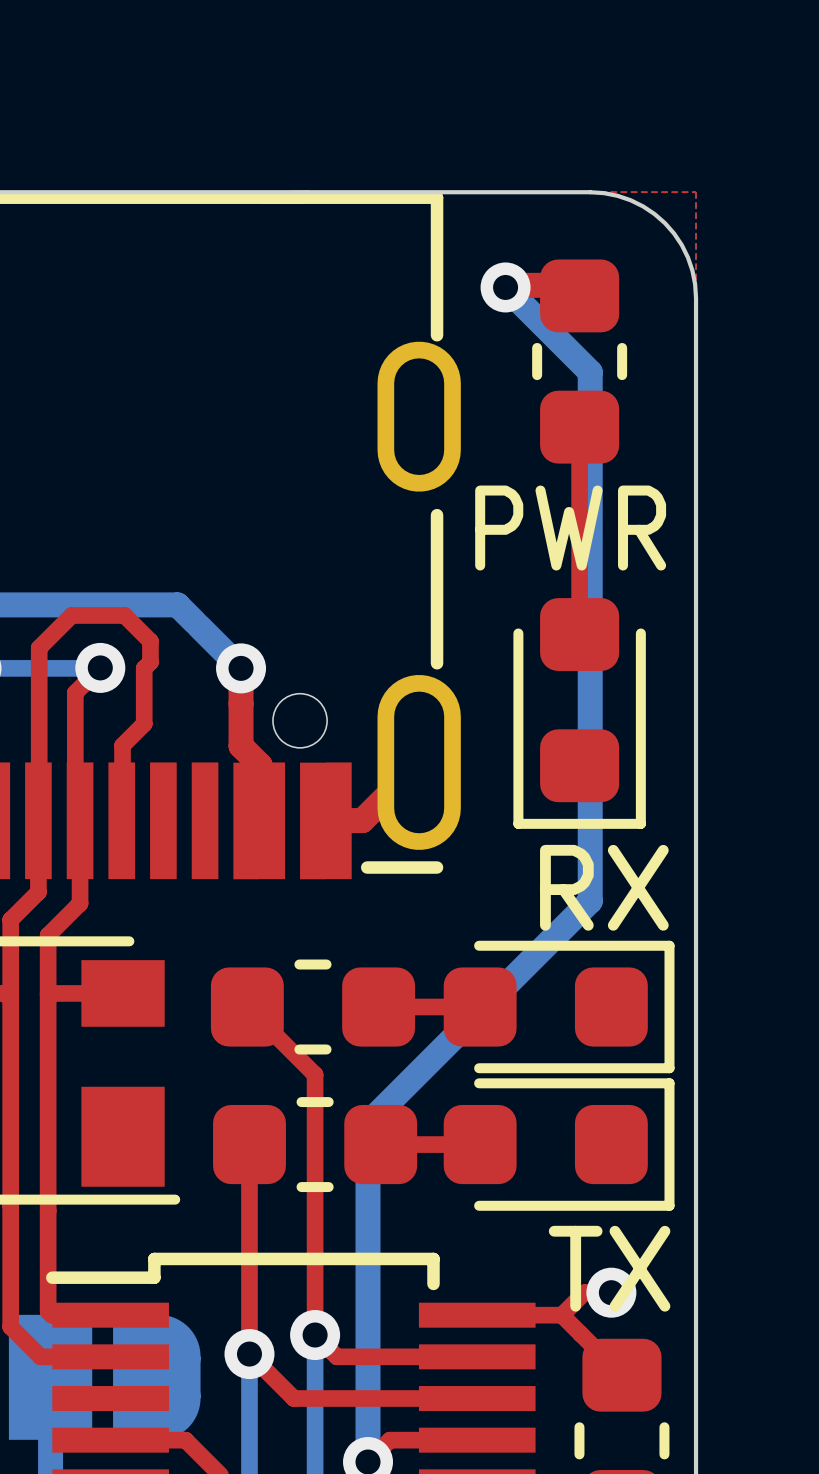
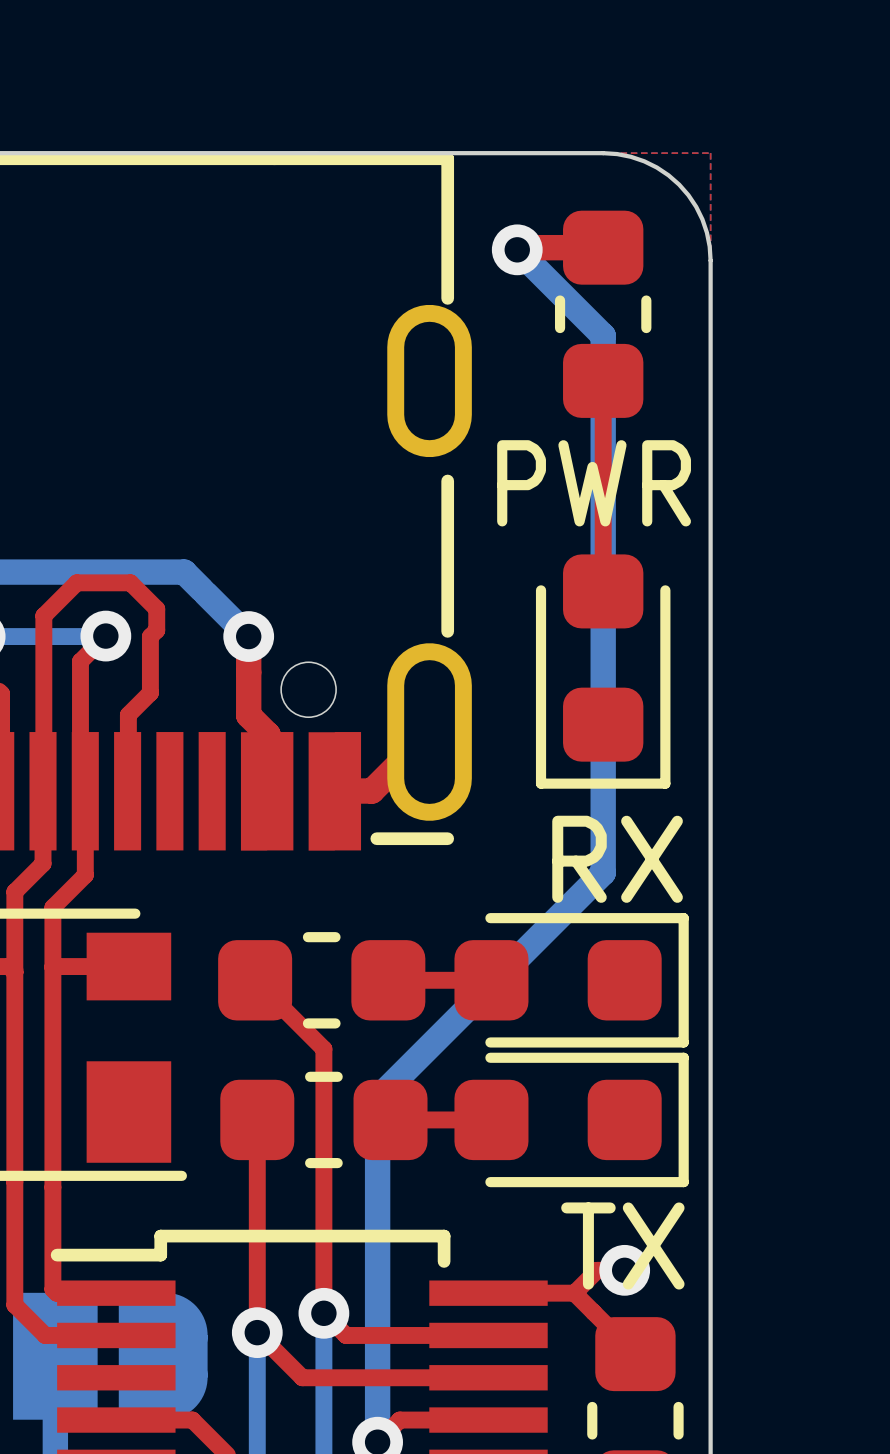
part position: (579, 361) -> (603, 314)
top track: (579, 429) (579, 636) -> (603, 380) (603, 591)
PWR position: (579, 713) -> (603, 671)

